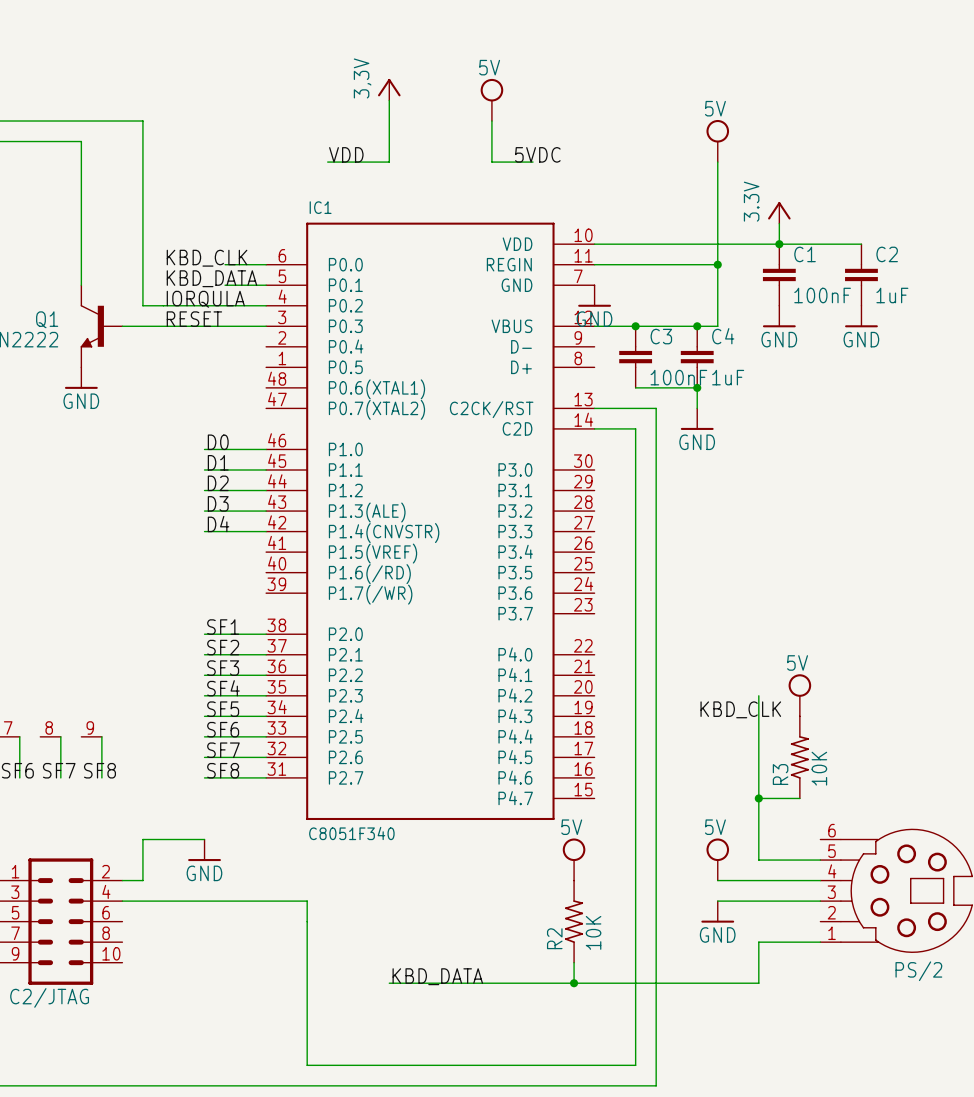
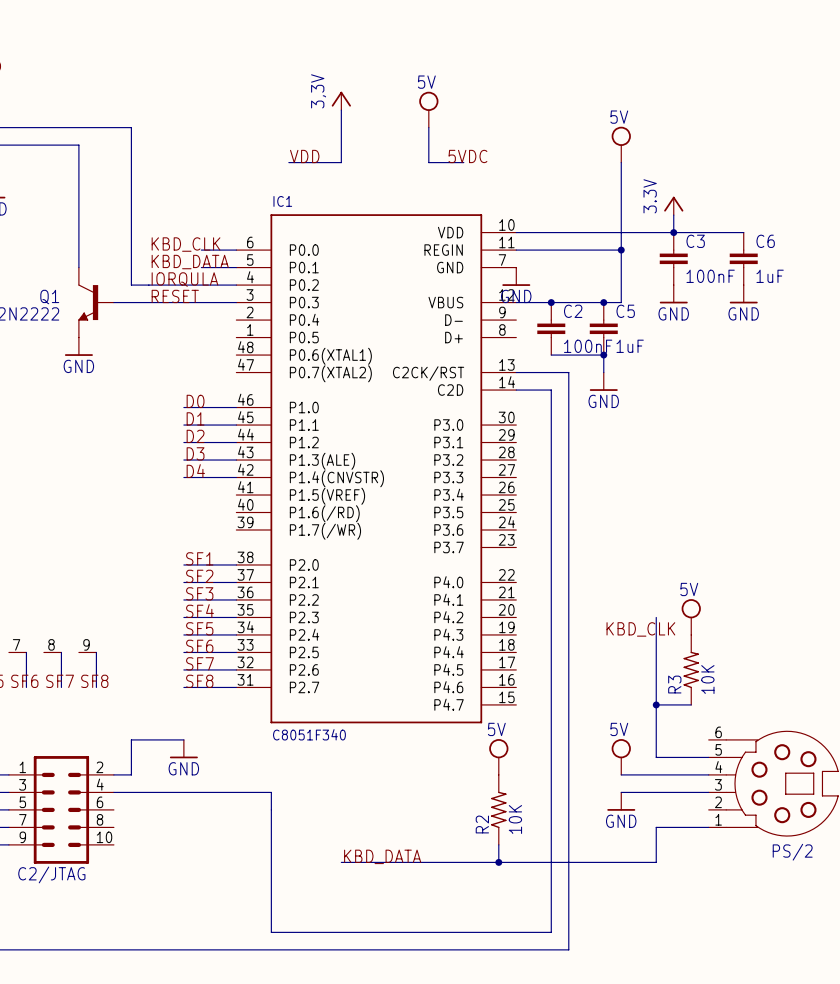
C1 name: C1 (805, 254) -> C3 (695, 241)
C2 name: C2 (887, 254) -> C6 (765, 241)
C3 name: C3 (661, 336) -> C2 (573, 311)
C4 name: C4 (723, 336) -> C5 (625, 311)

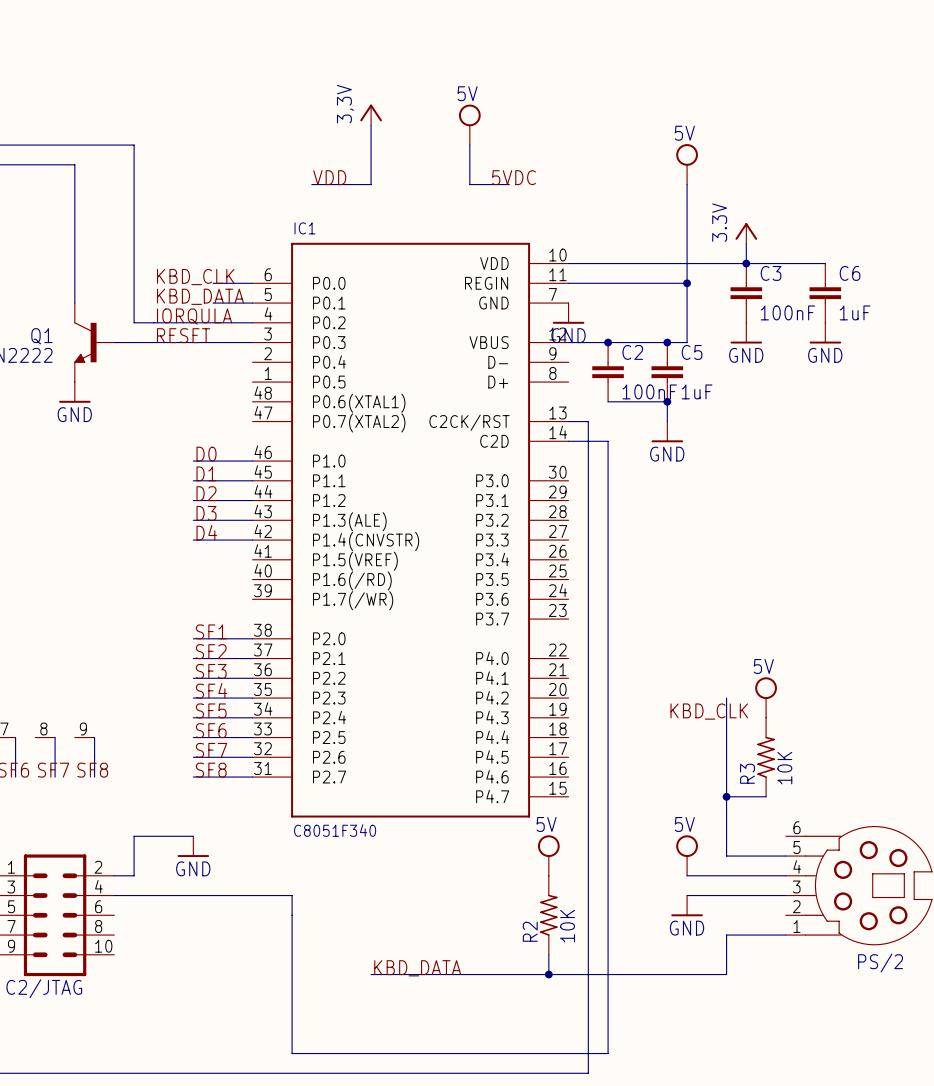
wire: (533, 372) (568, 372) (568, 949) (533, 949) -> (588, 421) (588, 1073)

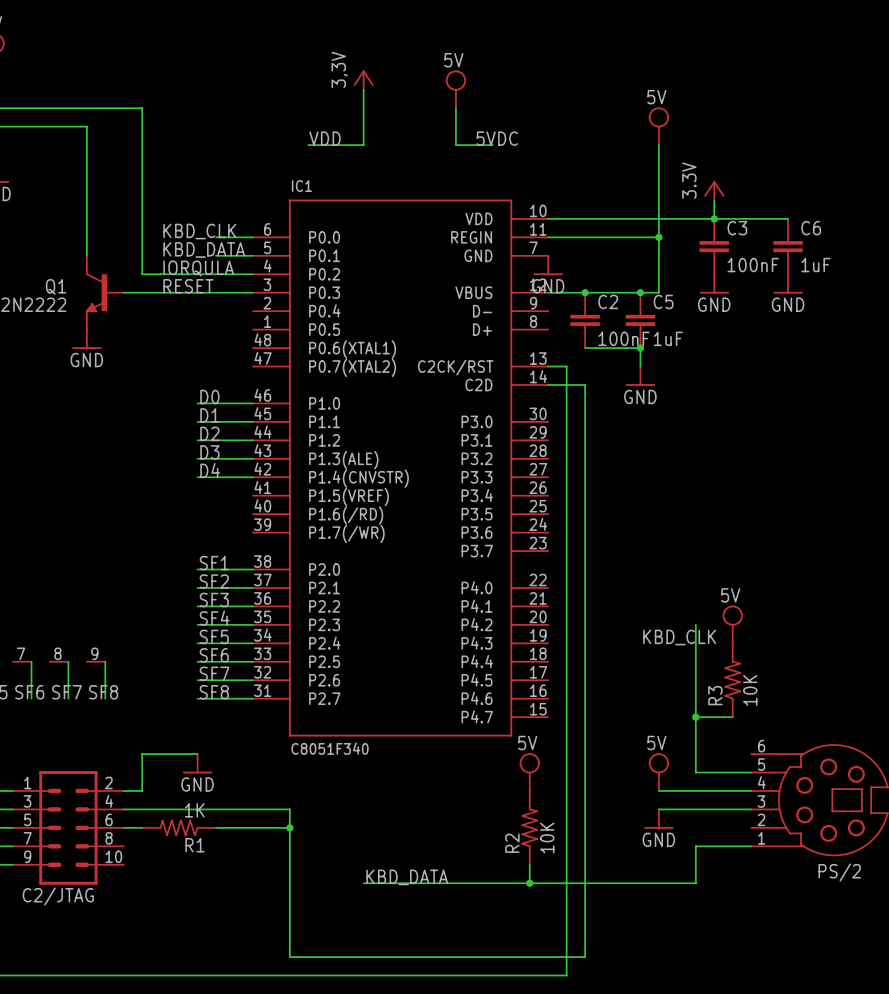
wire: none -> (123, 827) (142, 827)
R1: none -> 1K (179, 827)
wire: none -> (216, 827) (289, 827)
junction: none -> (289, 827)

